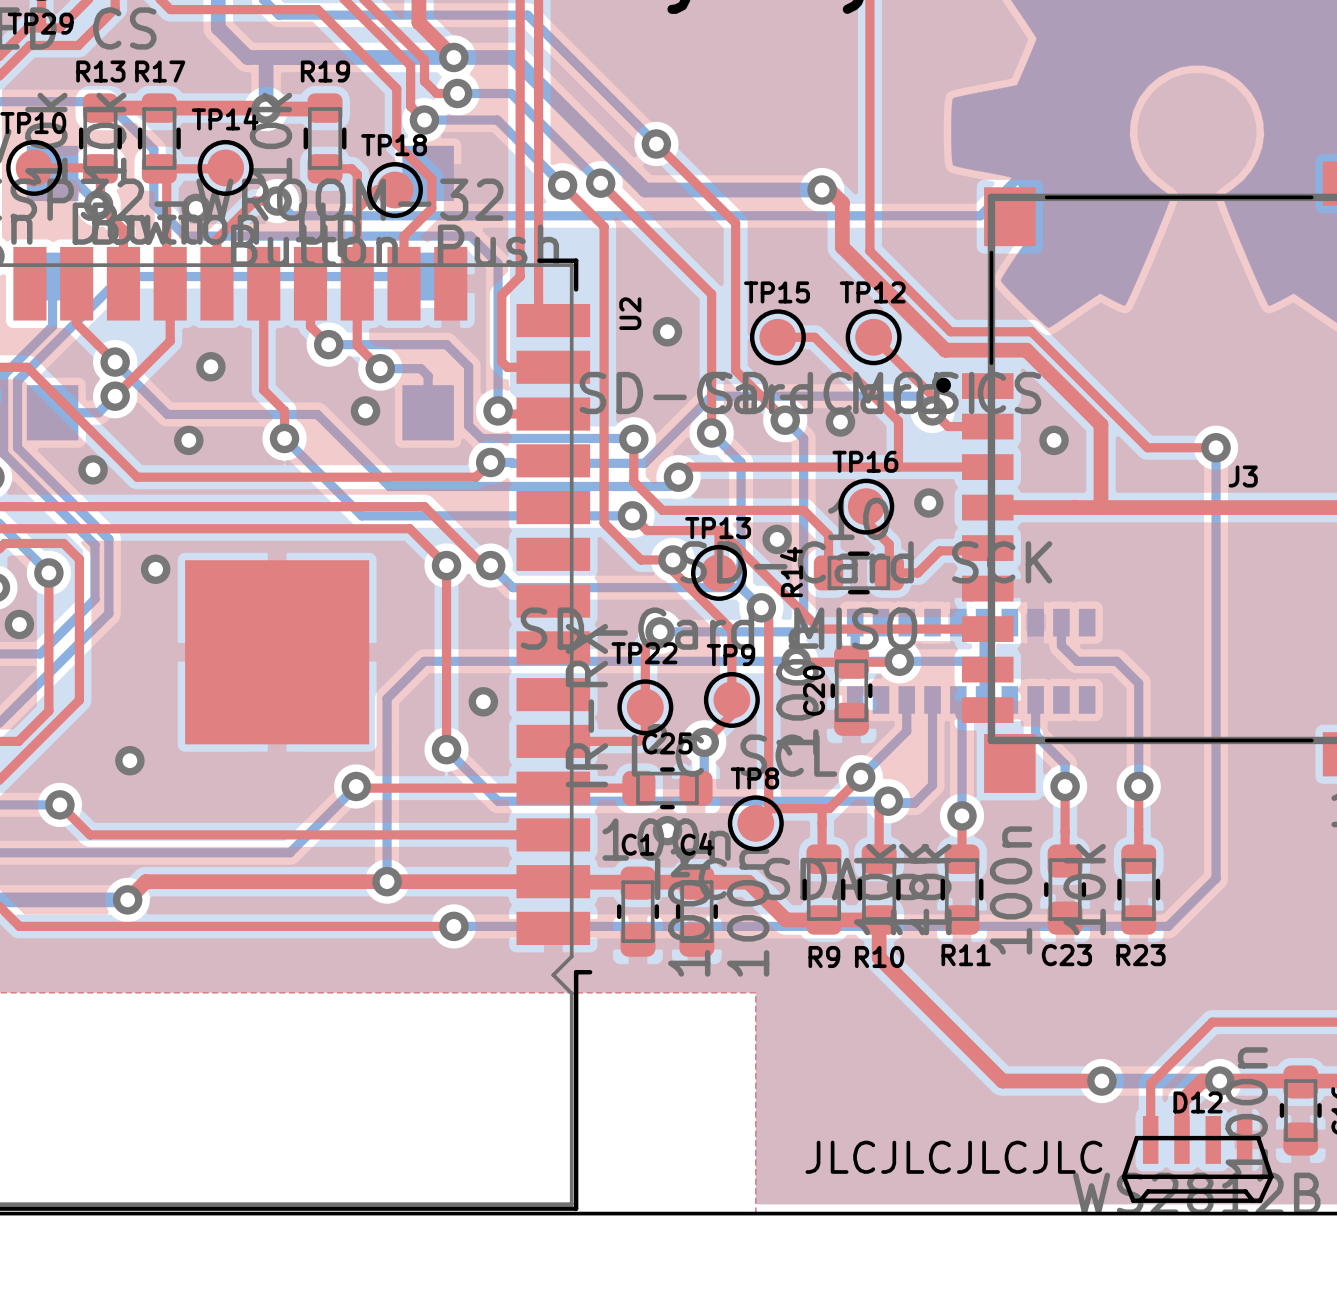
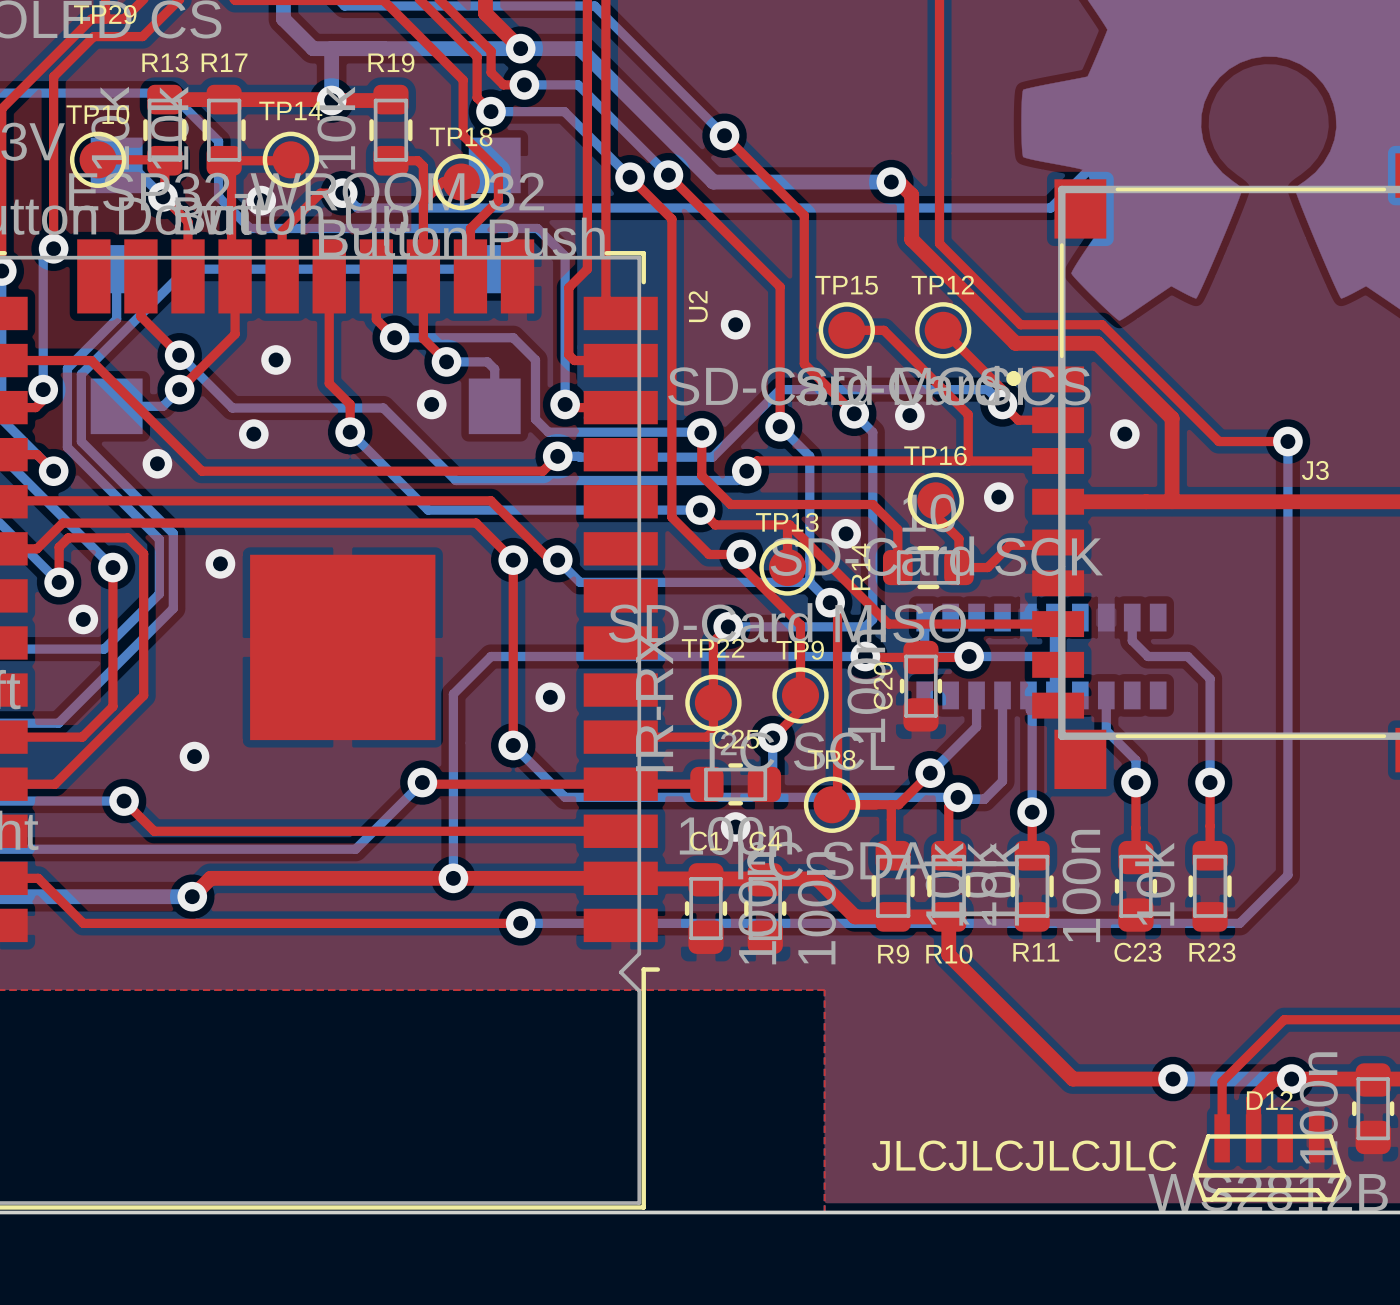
TP8 position: (755, 823) -> (832, 804)

